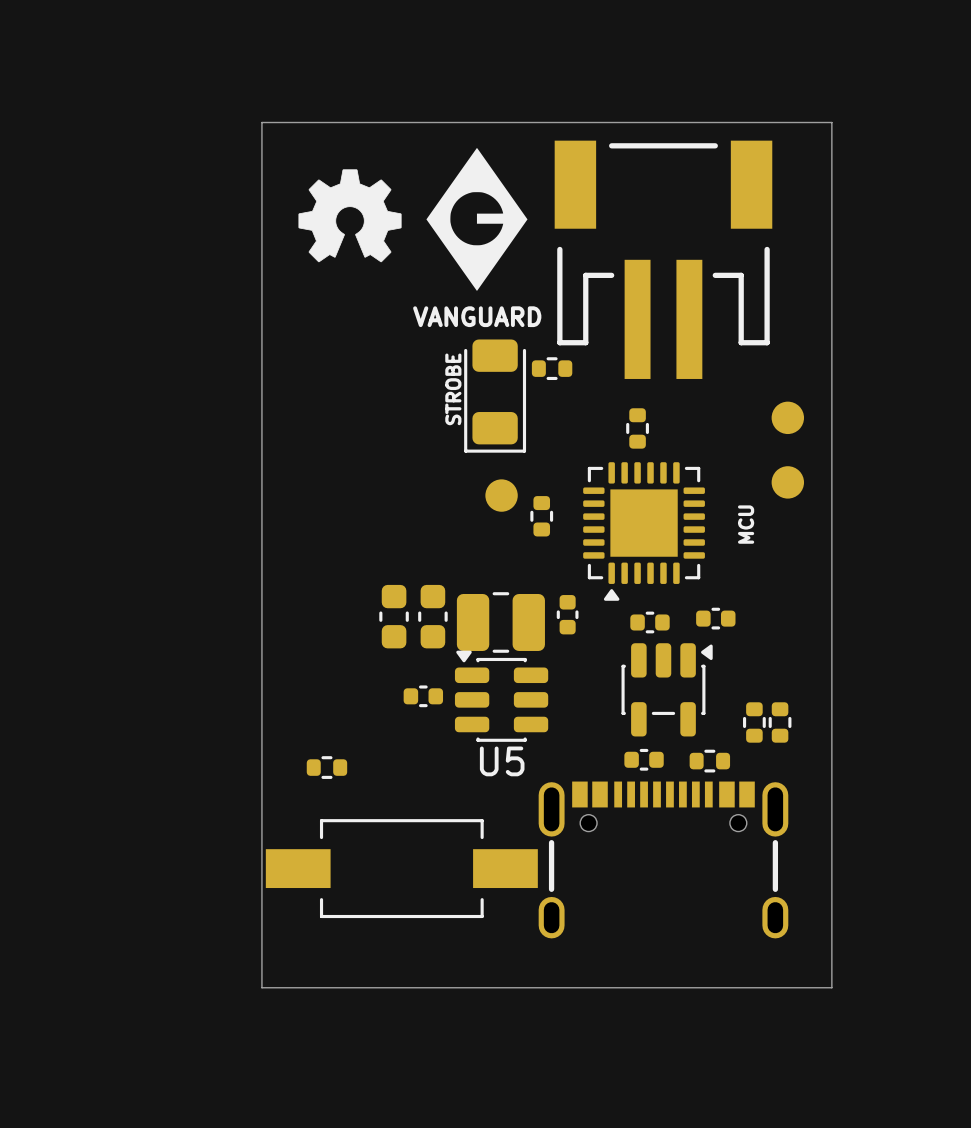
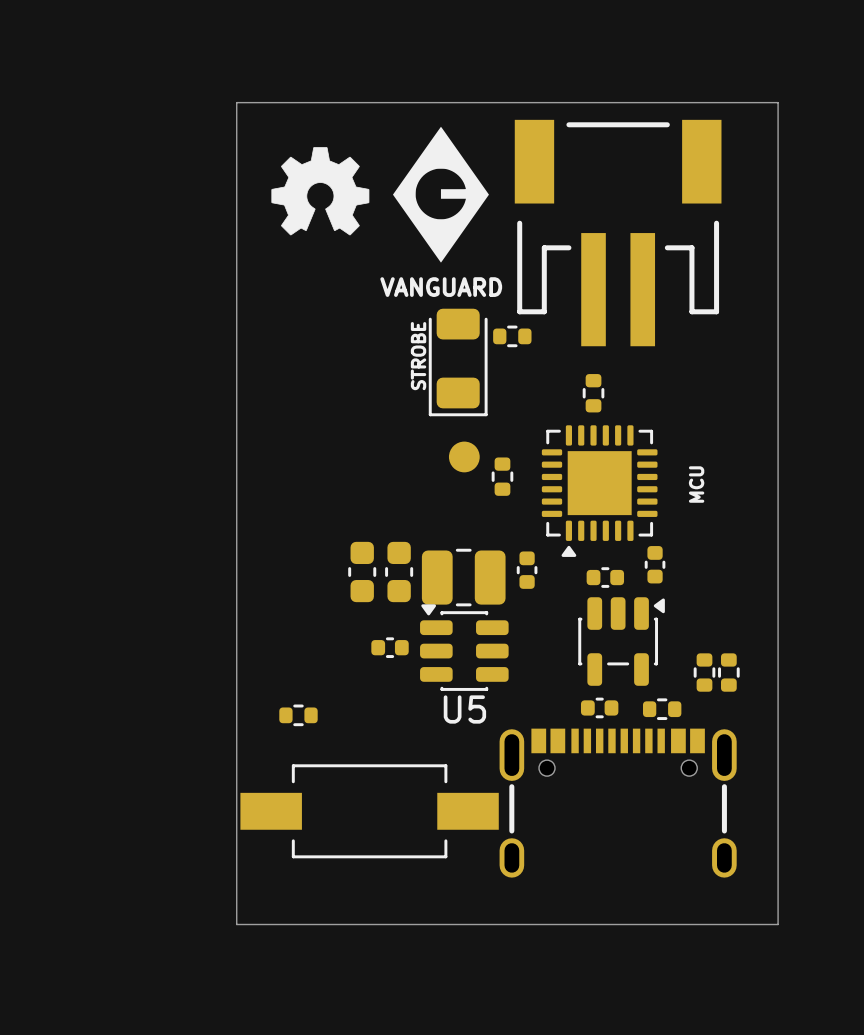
part: (787, 417) -> none
part: (787, 482) -> none
part rotation: 0° (715, 618) -> 90° clockwise (655, 564)

